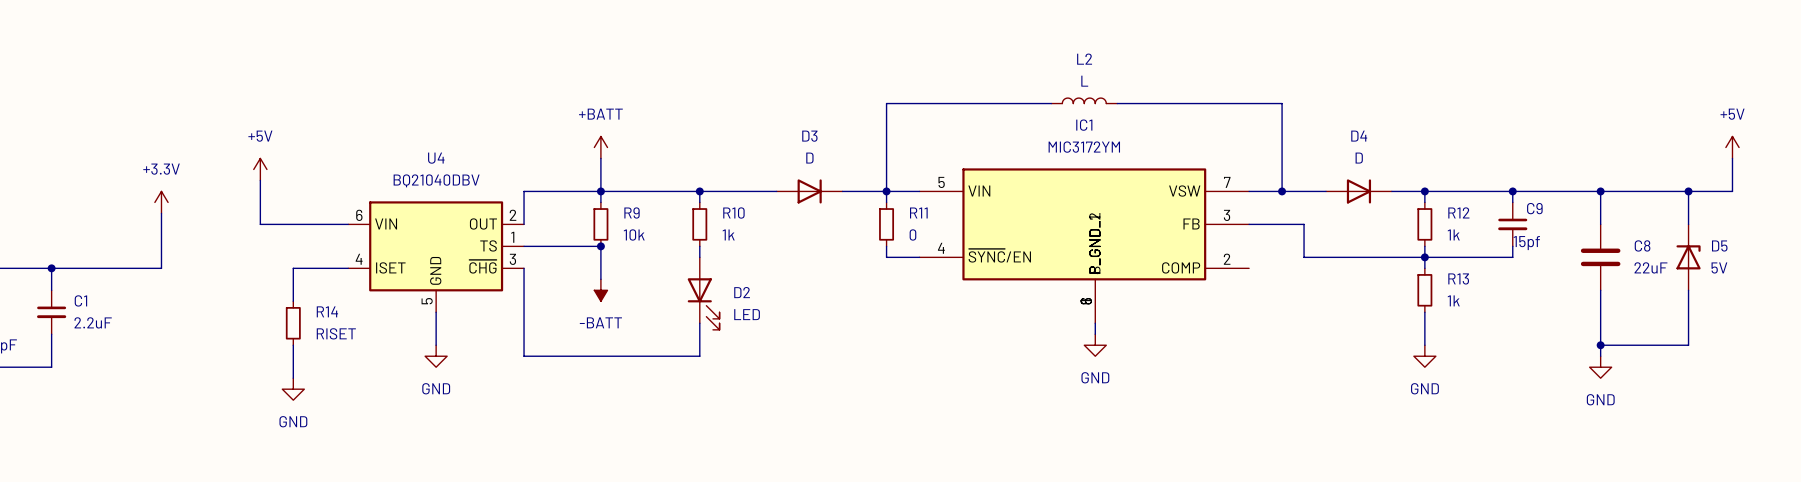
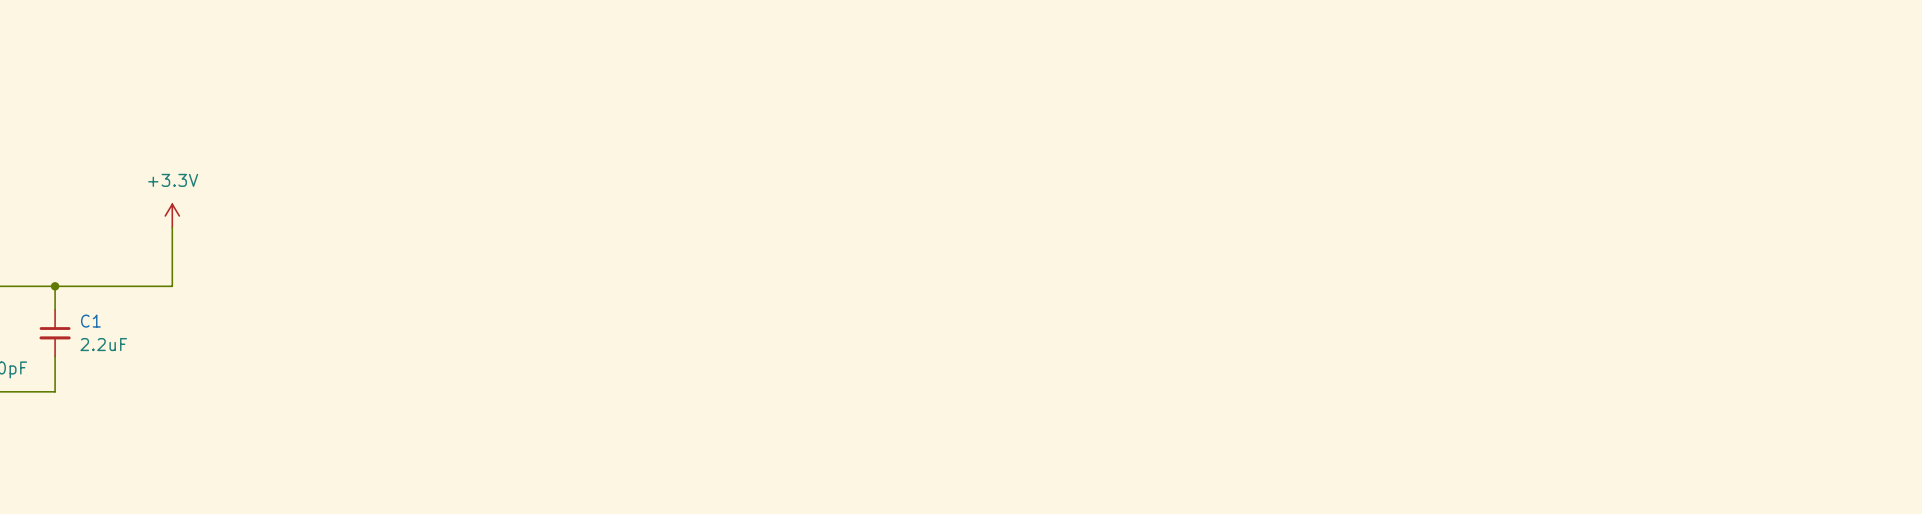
L2: L (1084, 100) -> none
wire: (1051, 103) (886, 103) (886, 202) -> none
wire: (1117, 103) (1282, 103) (1282, 191) -> none
power symbol: +BATT (600, 147) -> none
power symbol: +5V (1732, 147) -> none
wire: (600, 158) (600, 202) -> none
wire: (1732, 158) (1732, 191) (1391, 191) -> none
power symbol: +5V (260, 169) -> none
wire: (260, 180) (260, 224) (348, 224) -> none
junction: (600, 191) -> none
wire: (699, 191) (699, 202) -> none
junction: (699, 191) -> none
wire: (776, 191) (524, 191) (524, 224) -> none
D3: D (809, 191) -> none
wire: (842, 191) (919, 191) -> none
junction: (886, 191) -> none
wire: (1249, 191) (1326, 191) -> none
junction: (1282, 191) -> none
D4: D (1358, 191) -> none
wire: (1424, 191) (1424, 202) -> none
junction: (1424, 191) -> none
wire: (1512, 191) (1512, 202) -> none
junction: (1512, 191) -> none
wire: (1600, 191) (1600, 224) -> none
junction: (1600, 191) -> none
wire: (1688, 191) (1688, 224) -> none
junction: (1688, 191) -> none
R9: 10k (600, 224) -> none
R10: 1k (699, 224) -> none
R11: 0 (886, 224) -> none
wire: (1249, 224) (1304, 224) (1304, 257) (1512, 257) (1512, 246) -> none
R12: 1k (1424, 224) -> none
C9: 15pf (1512, 224) -> none
IC1: MIC3172YM (1084, 245) -> none
wire: (524, 246) (600, 246) (600, 279) -> none
junction: (600, 246) -> none
wire: (699, 246) (699, 257) -> none
wire: (886, 246) (886, 257) (919, 257) -> none
wire: (1424, 246) (1424, 268) -> none
U4: BQ21040DBV (436, 256) -> none
junction: (1424, 257) -> none
C8: 22uF (1600, 257) -> none
D5: 5V (1688, 257) -> none
wire: (348, 268) (293, 268) (293, 301) -> none
wire: (524, 268) (524, 356) (699, 356) (699, 323) -> none
power symbol: -BATT (600, 290) -> none
R13: 1k (1424, 290) -> none
wire: (1600, 290) (1600, 356) -> none
wire: (1688, 290) (1688, 345) (1600, 345) -> none
D2: LED (703, 293) -> none
wire: (436, 312) (436, 345) -> none
wire: (1424, 312) (1424, 345) -> none
R14: RISET (293, 323) -> none
wire: (1095, 323) (1095, 334) -> none
wire: (293, 345) (293, 378) -> none
power symbol: GND (1095, 345) -> none
junction: (1600, 345) -> none
power symbol: GND (436, 356) -> none
power symbol: GND (1424, 356) -> none
power symbol: GND (1600, 367) -> none
power symbol: GND (293, 389) -> none

